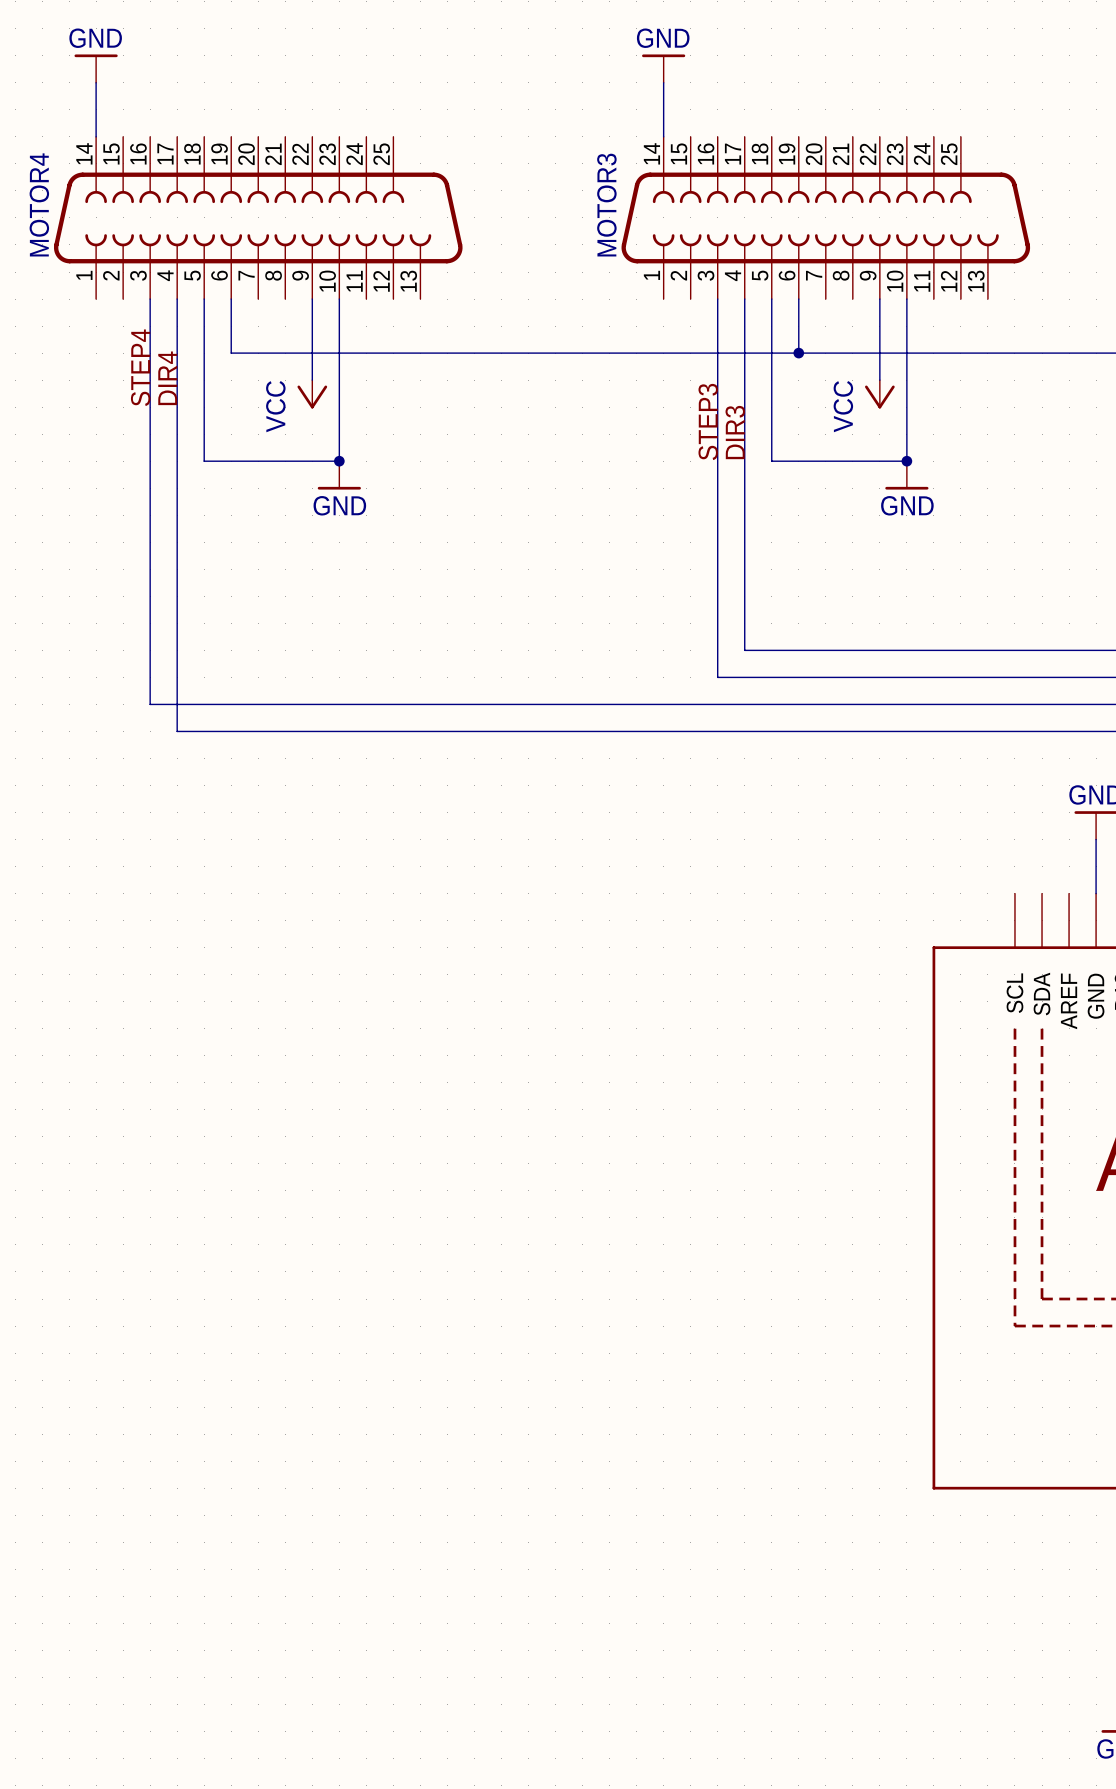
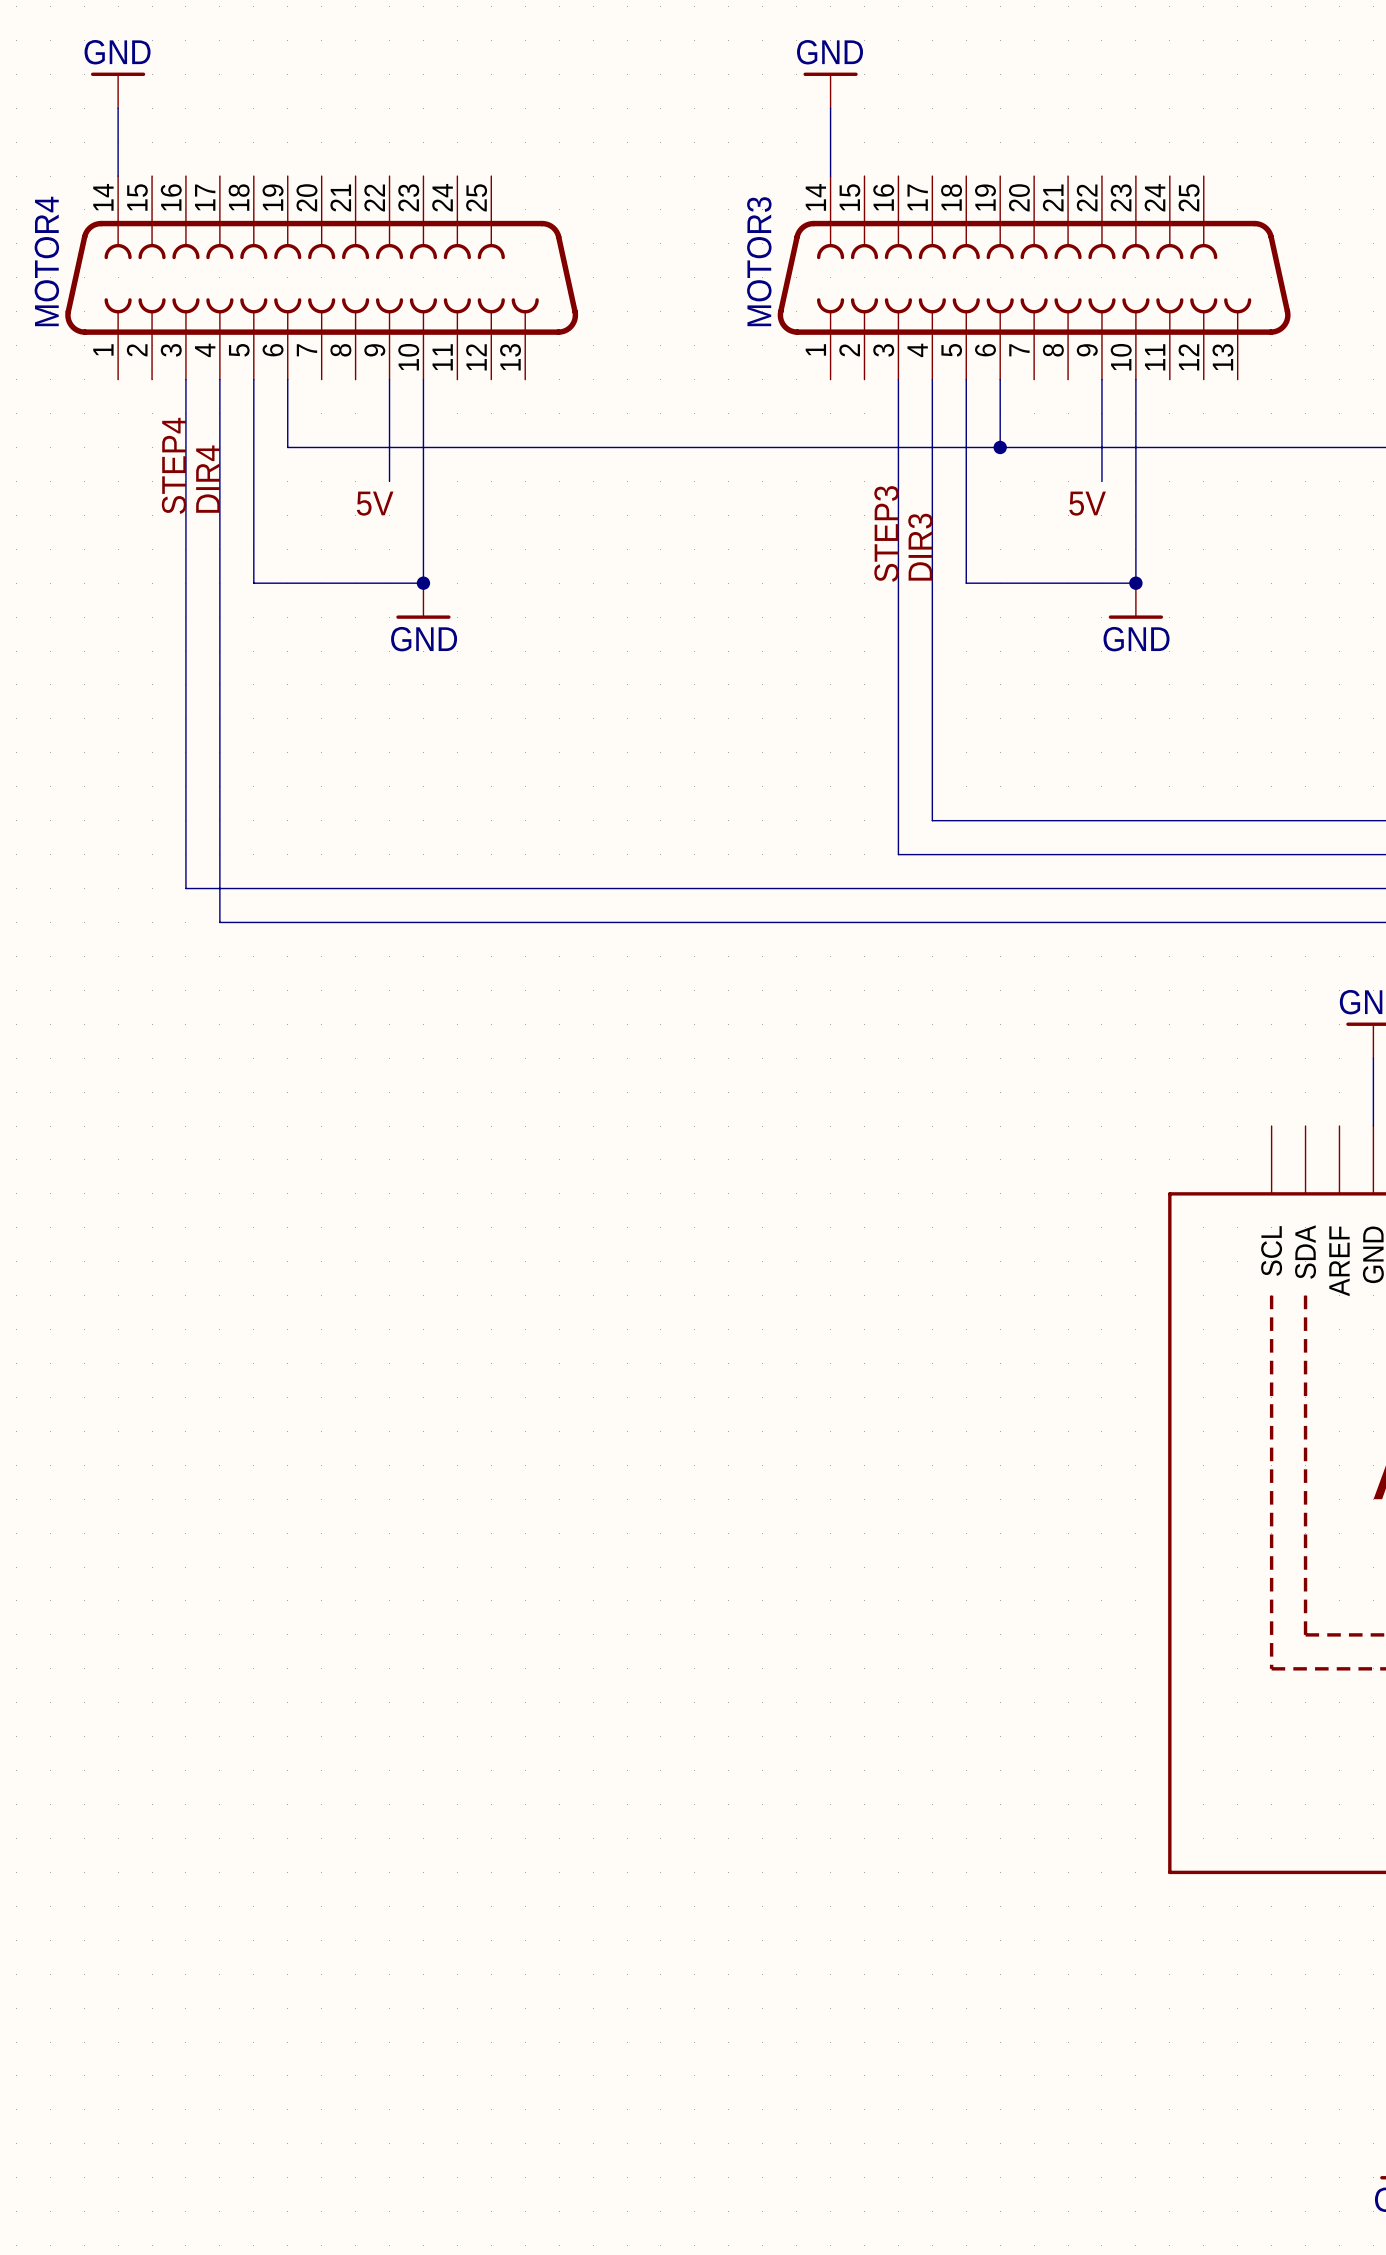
power symbol: VCC (312, 394) -> none
power symbol: VCC (879, 394) -> none
label: none -> 5V (375, 503)
label: none -> 5V (1087, 503)

